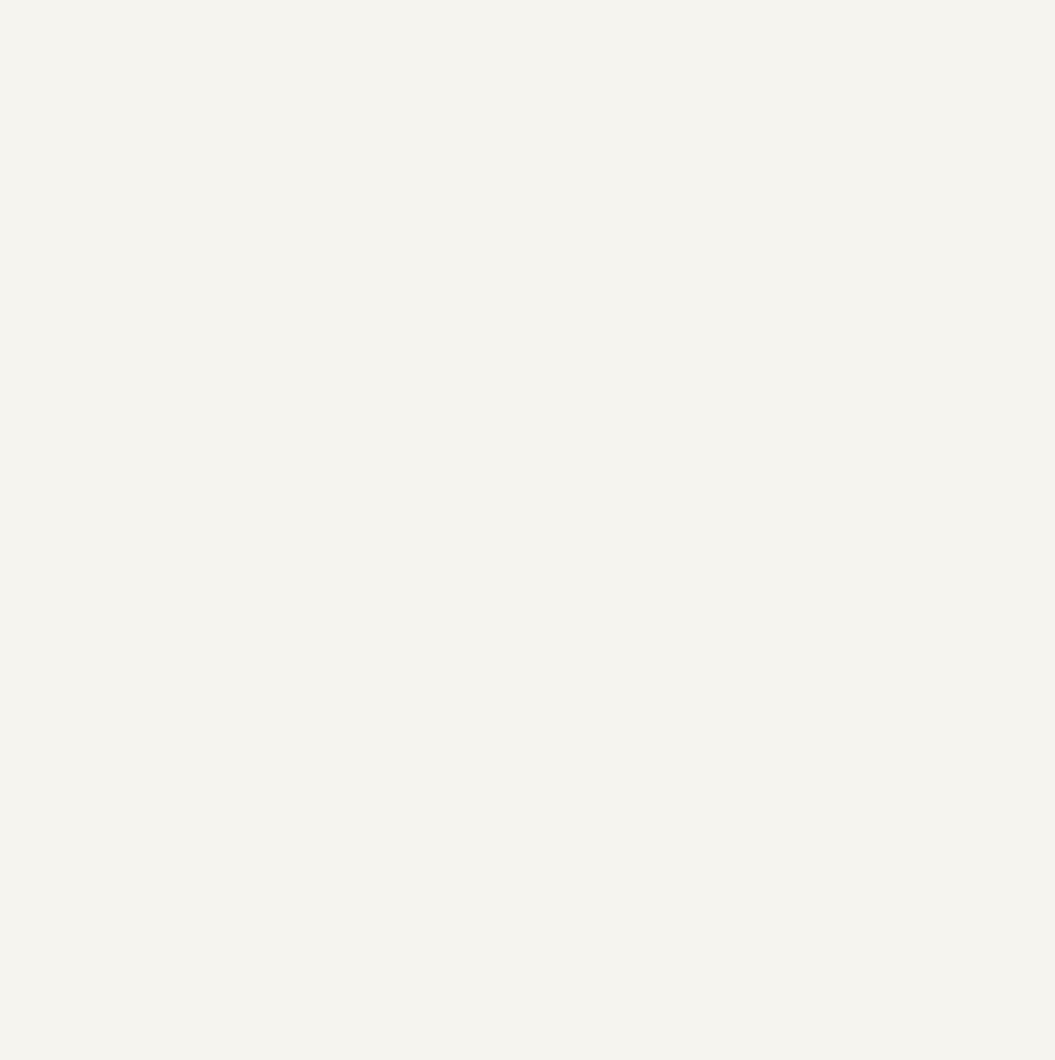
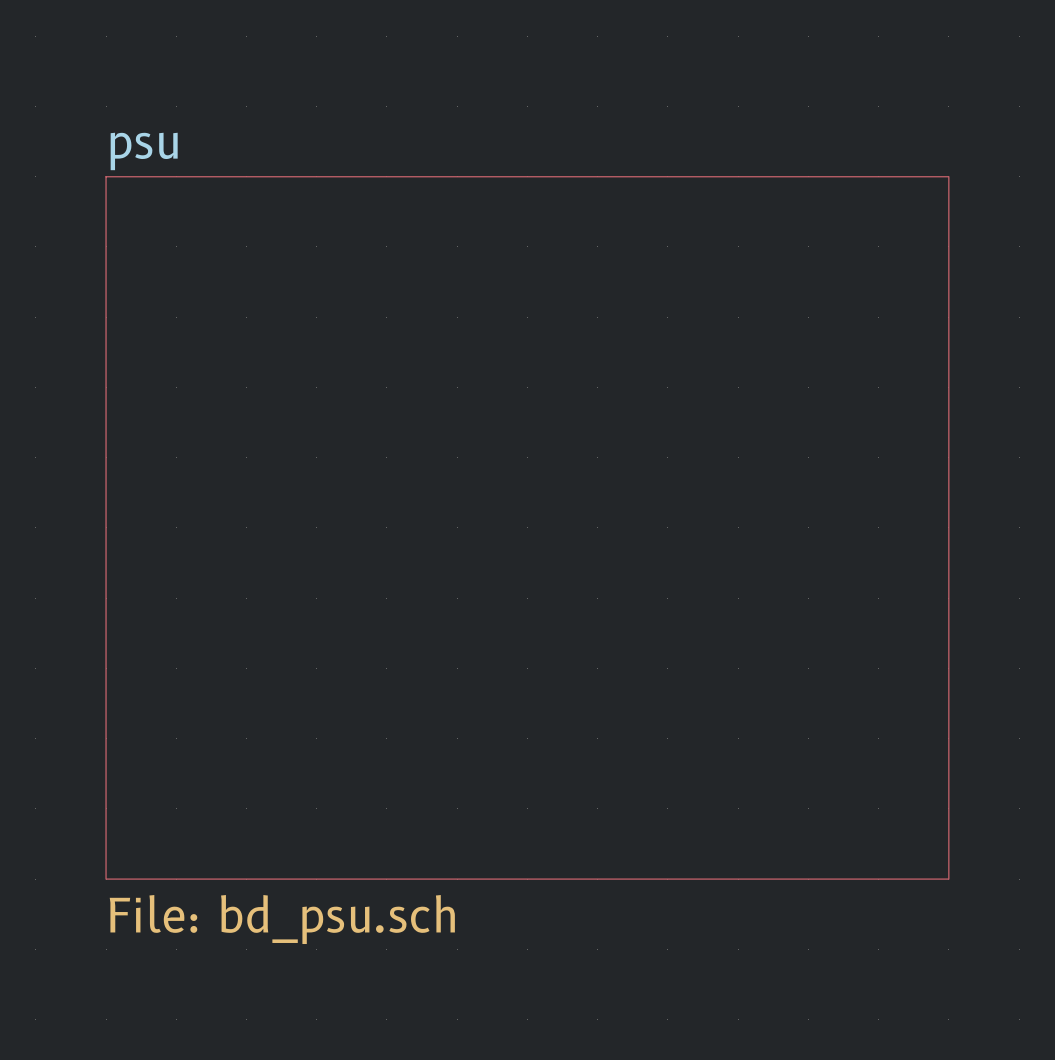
sheet psu: none -> File: bd_psu.sch (527, 527)

